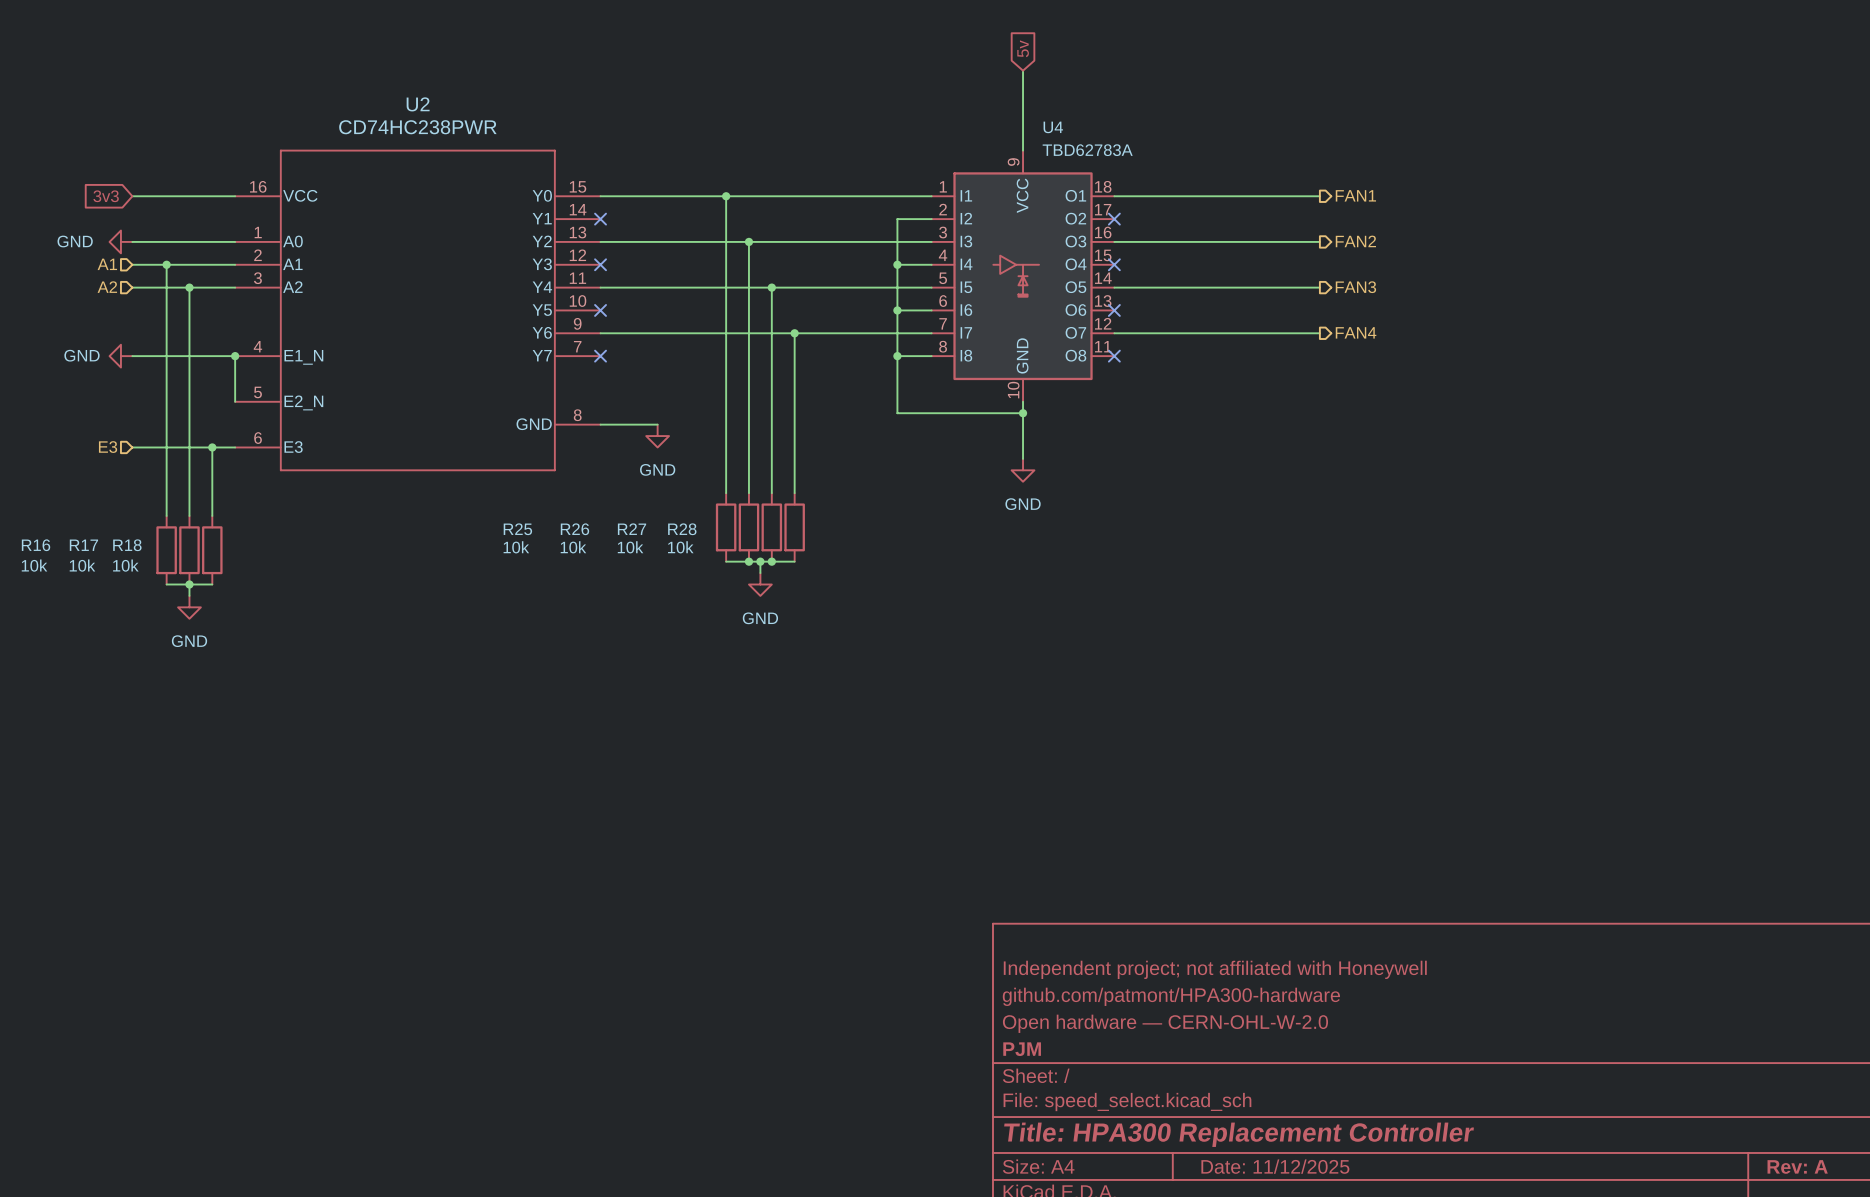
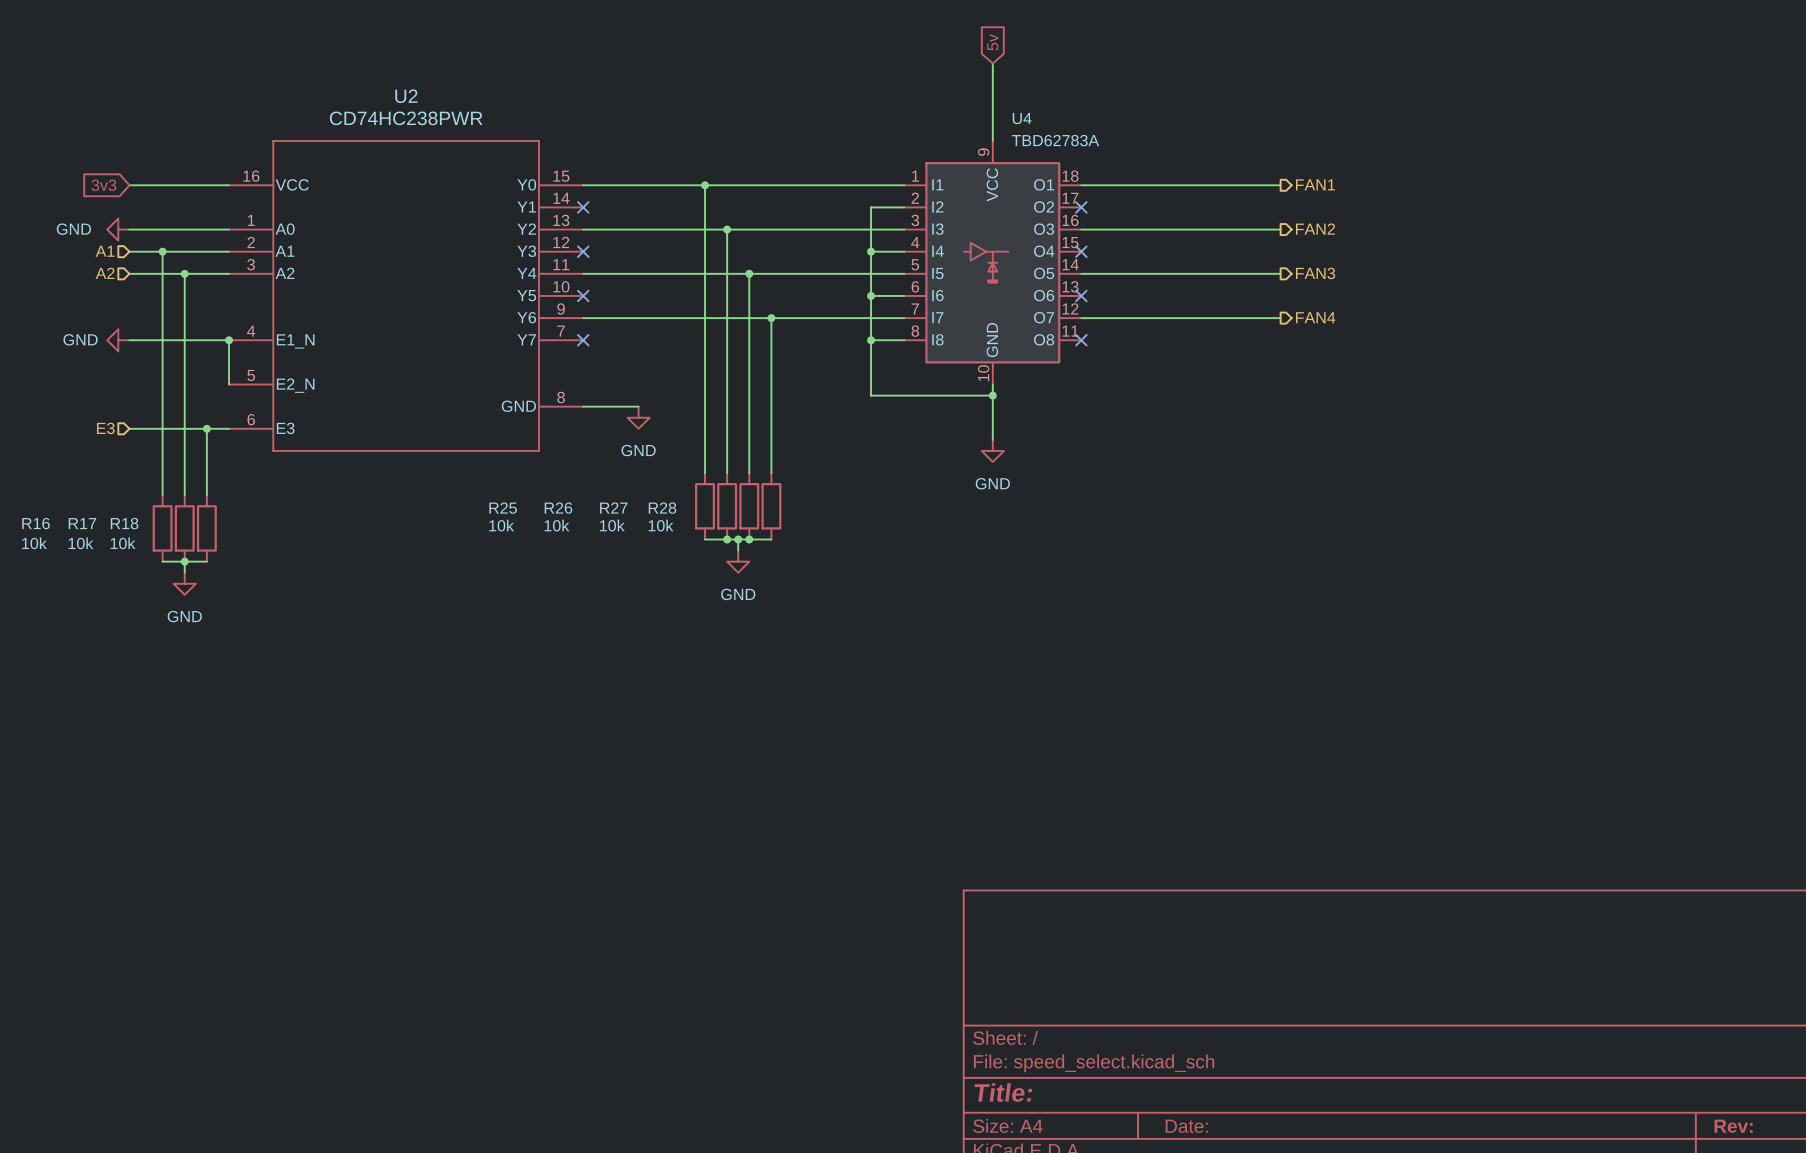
title block: Independent project; not affiliated with Honeywell (1215, 969) -> none
title block: github.com/patmont/HPA300-hardware (1171, 996) -> none
title block: Open hardware — CERN-OHL-W-2.0 (1165, 1023) -> none
title block: PJM (1022, 1049) -> none
title block: Title: HPA300 Replacement Controller (1239, 1134) -> Title: (1003, 1092)
title block: Date: 11/12/2025 (1275, 1166) -> Date: (1186, 1126)
title block: Rev: A (1797, 1166) -> Rev: (1733, 1126)

